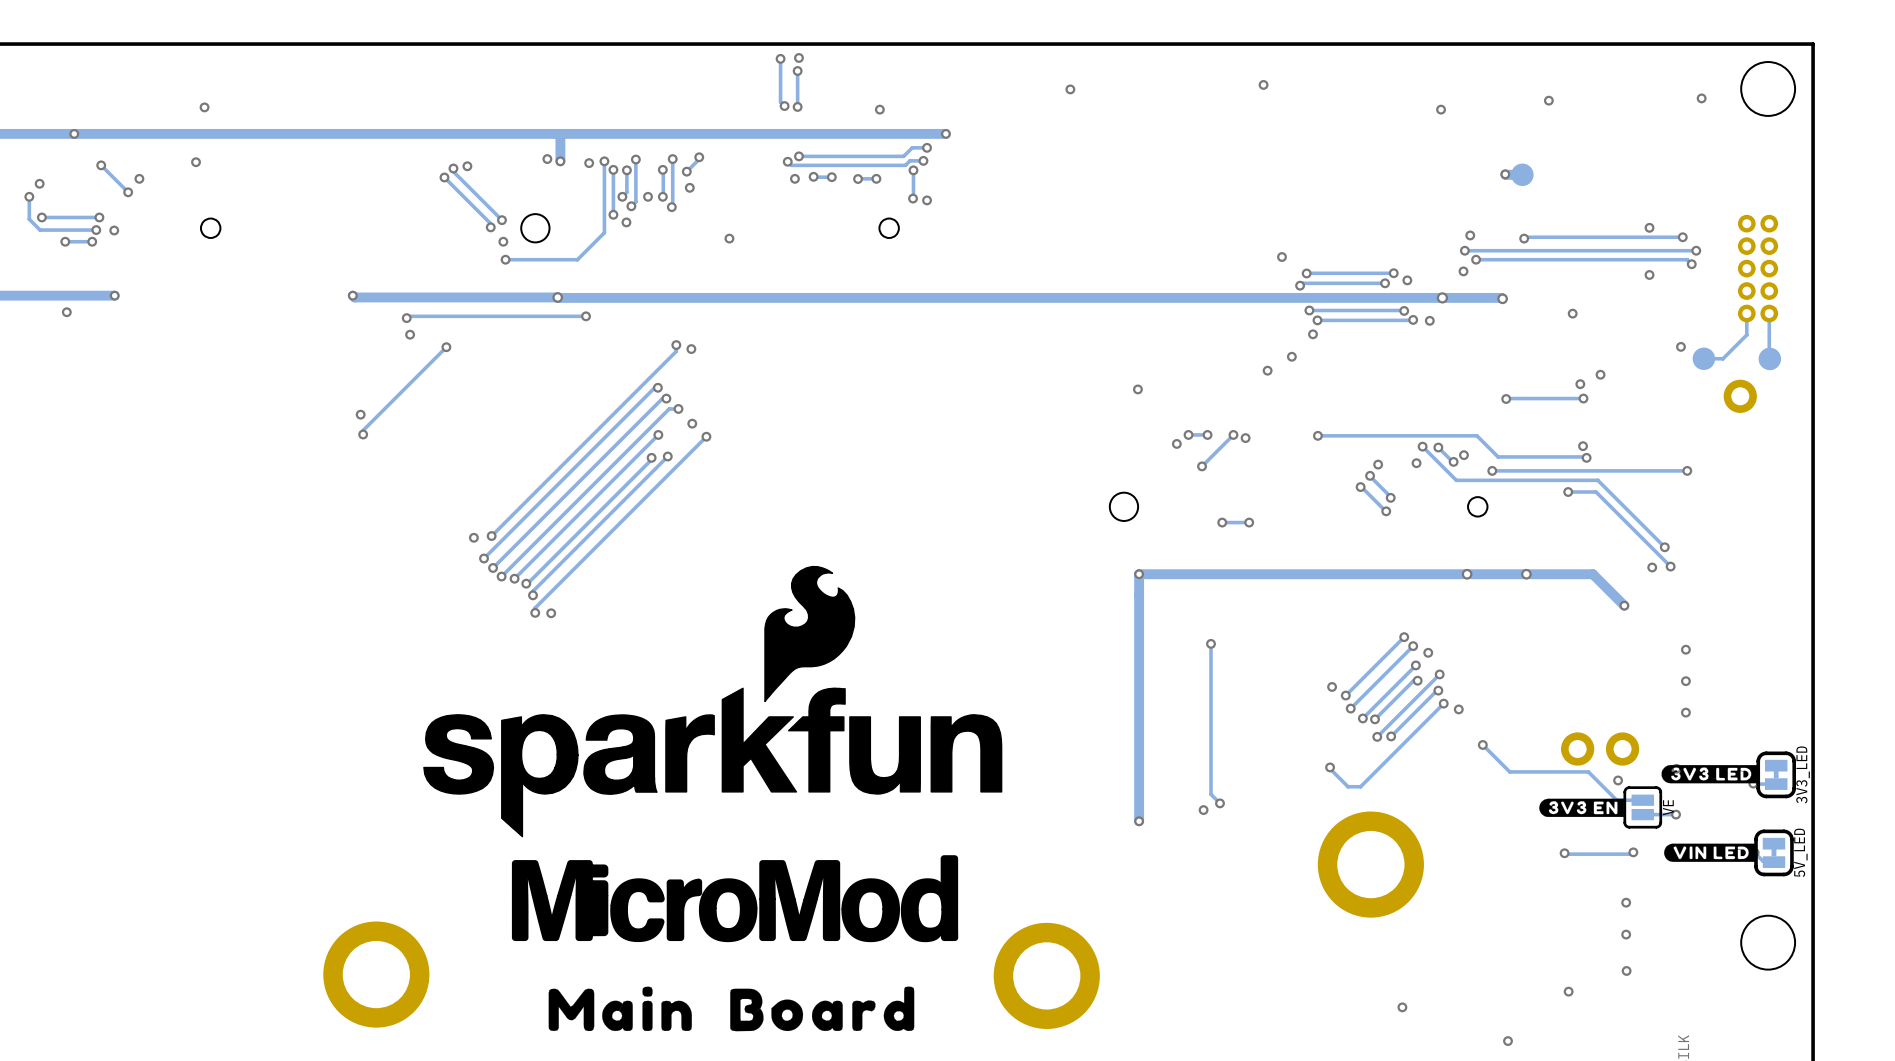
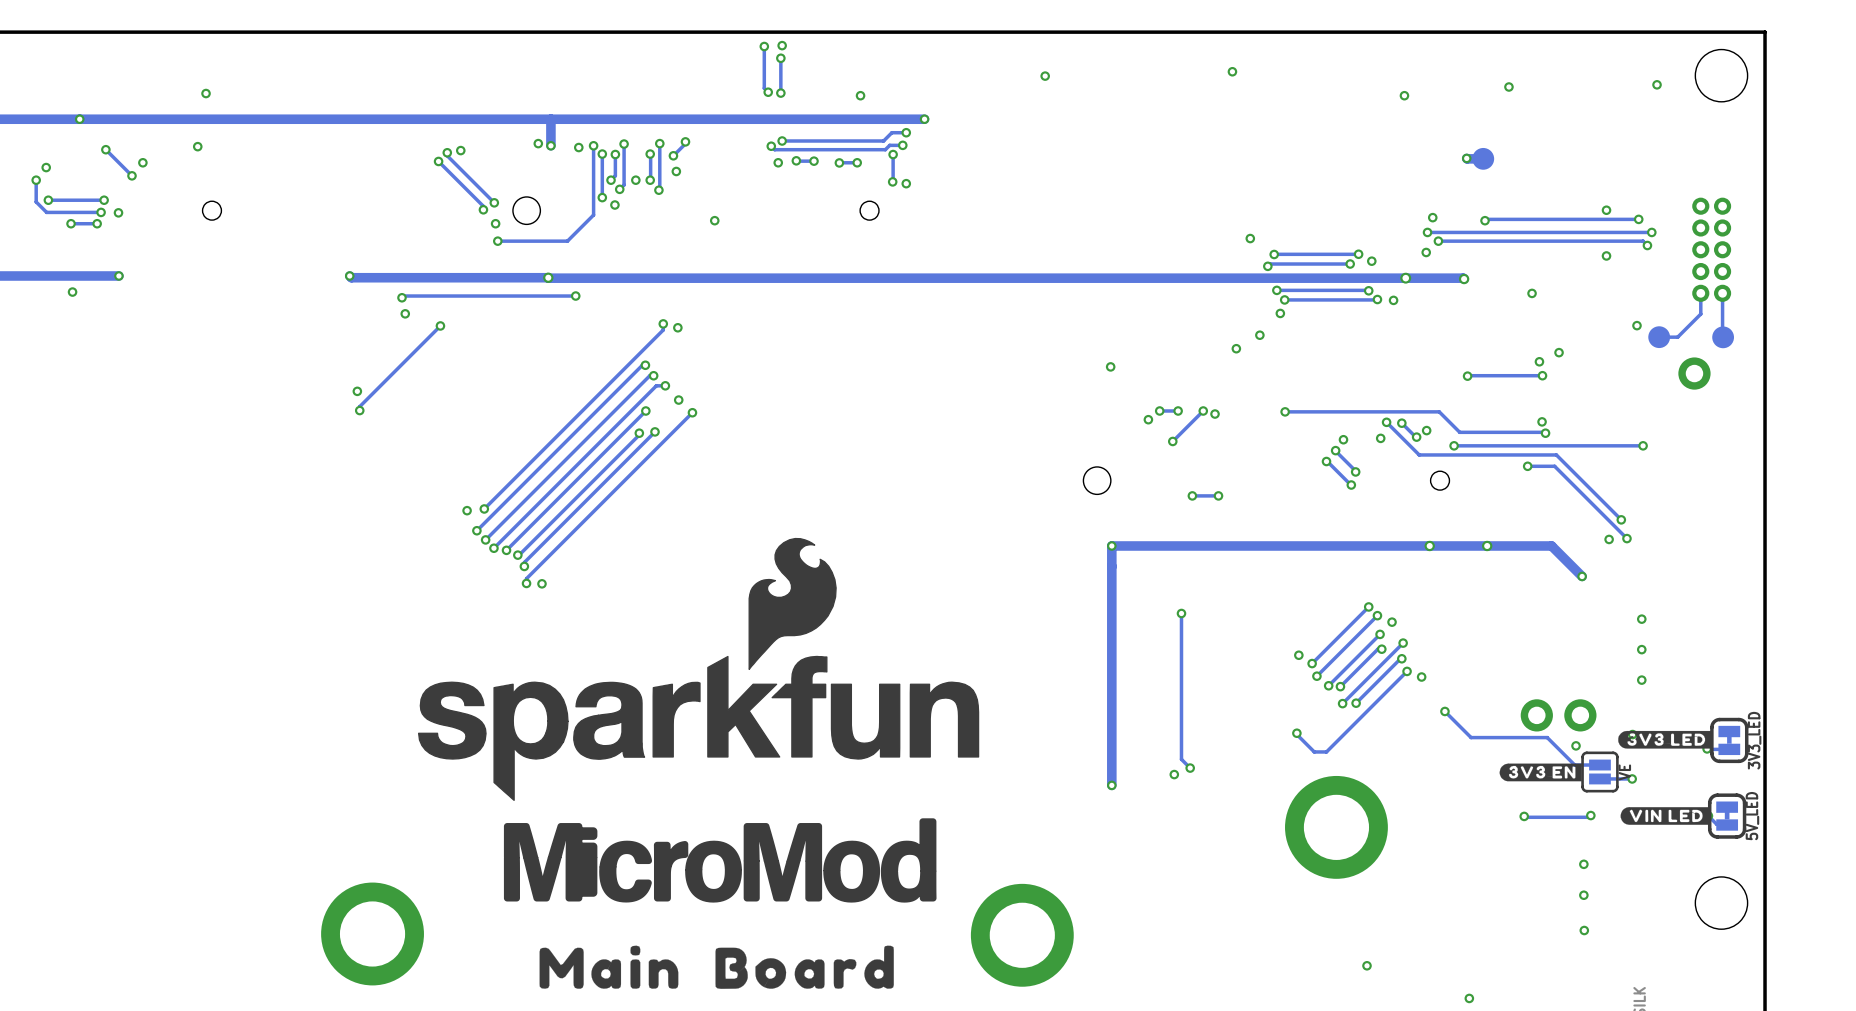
via: (1568, 991) -> none

